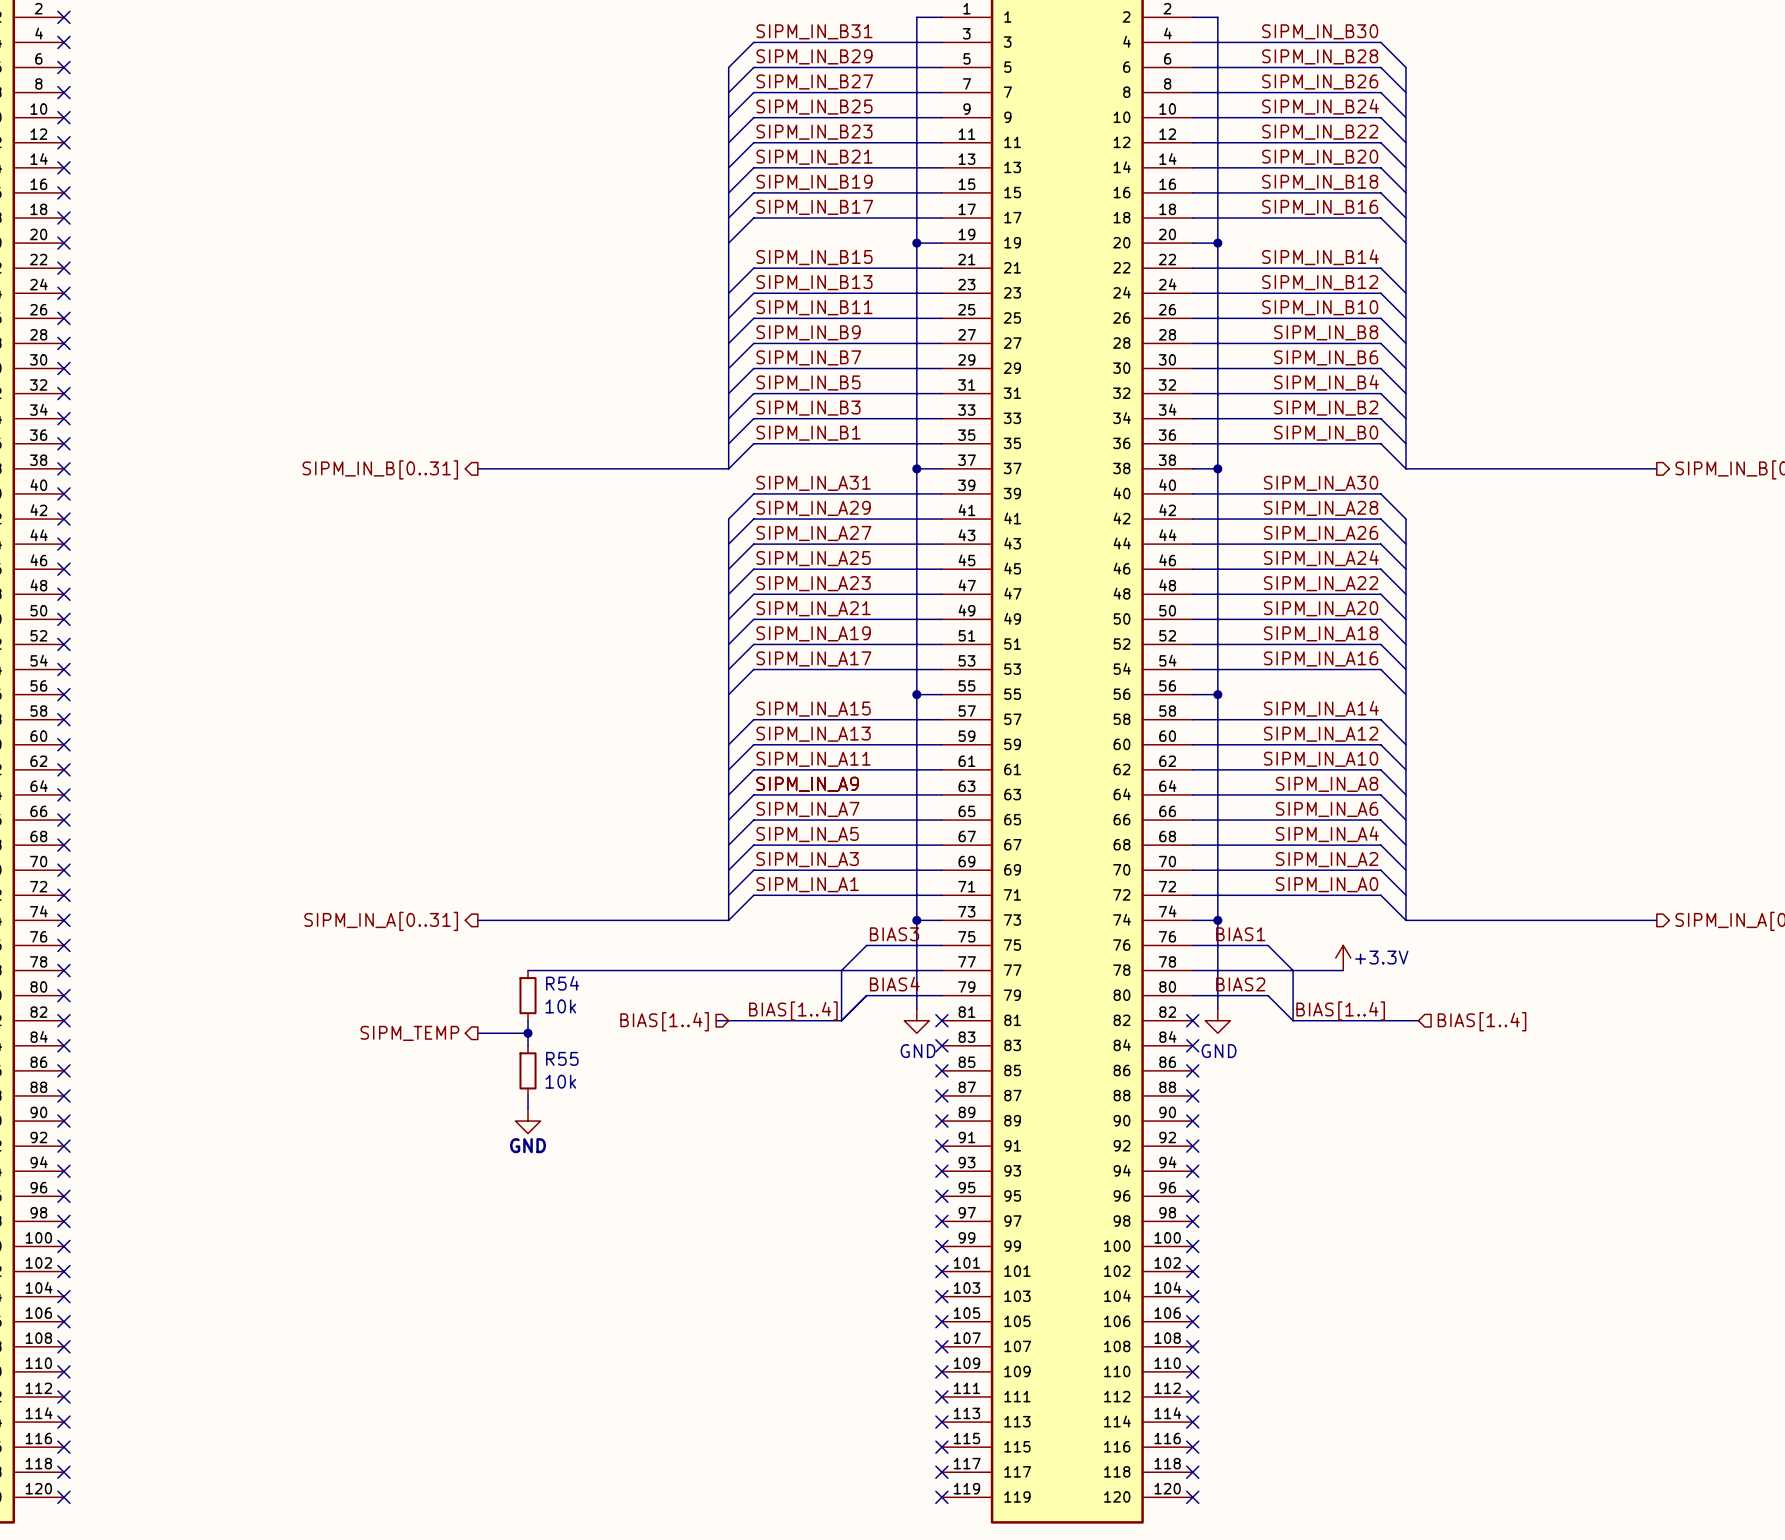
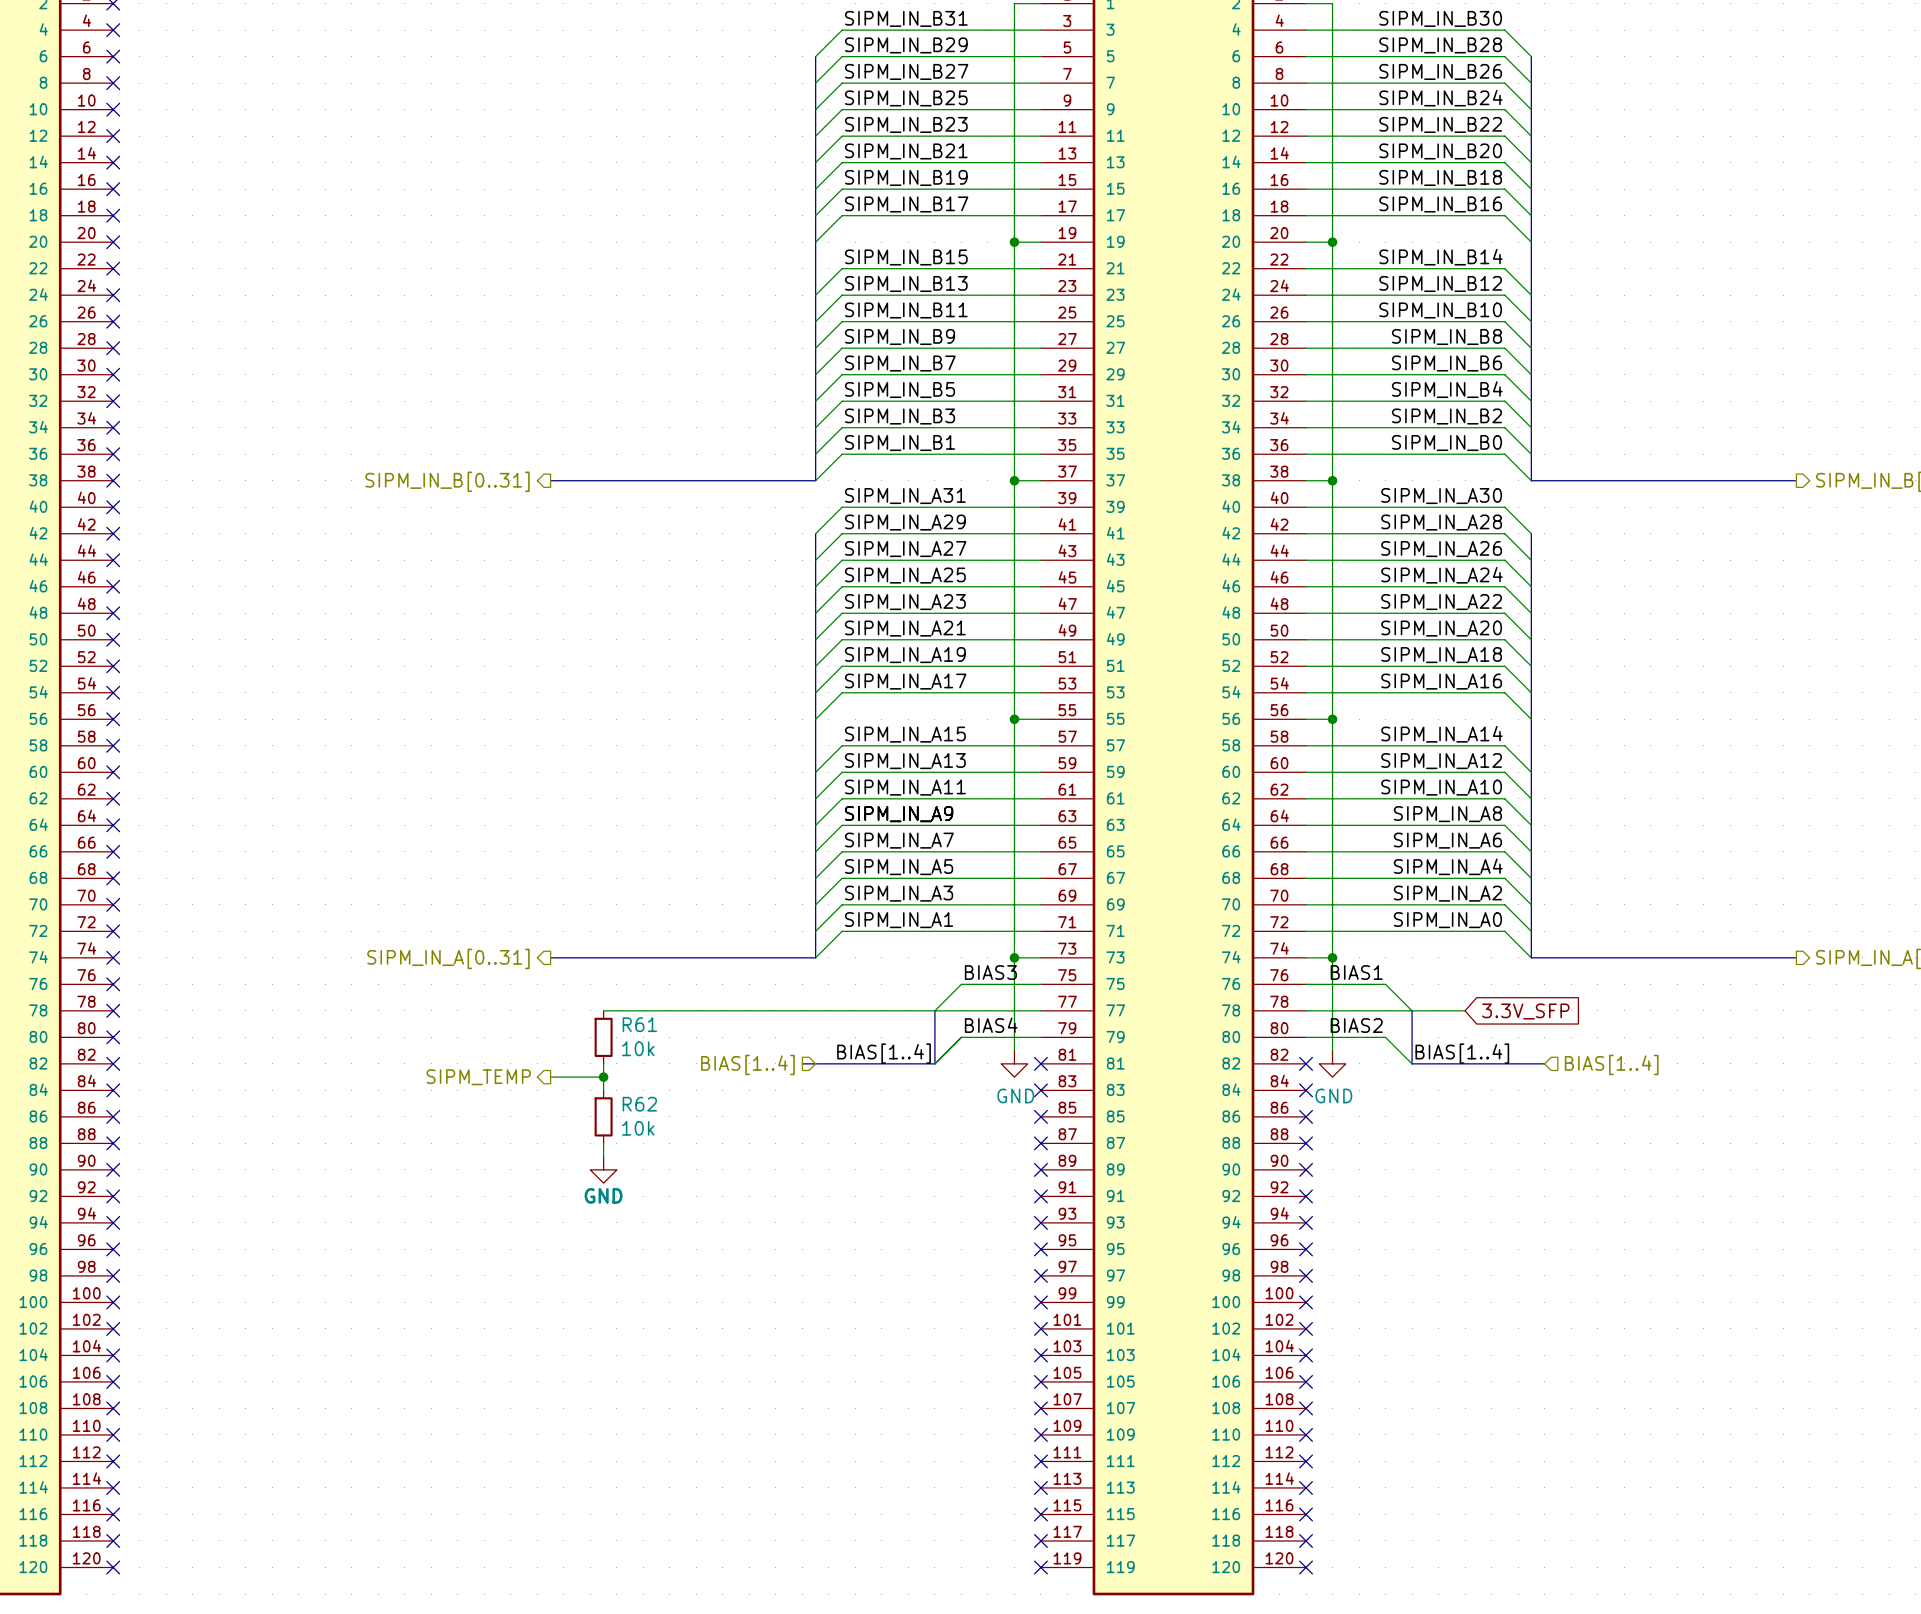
power symbol: +3.3V (1343, 958) -> none
global label: none -> 3.3V_SFP (1525, 1011)
R54 name: R54 (562, 983) -> R61 (639, 1024)
R55 name: R55 (562, 1058) -> R62 (639, 1104)

